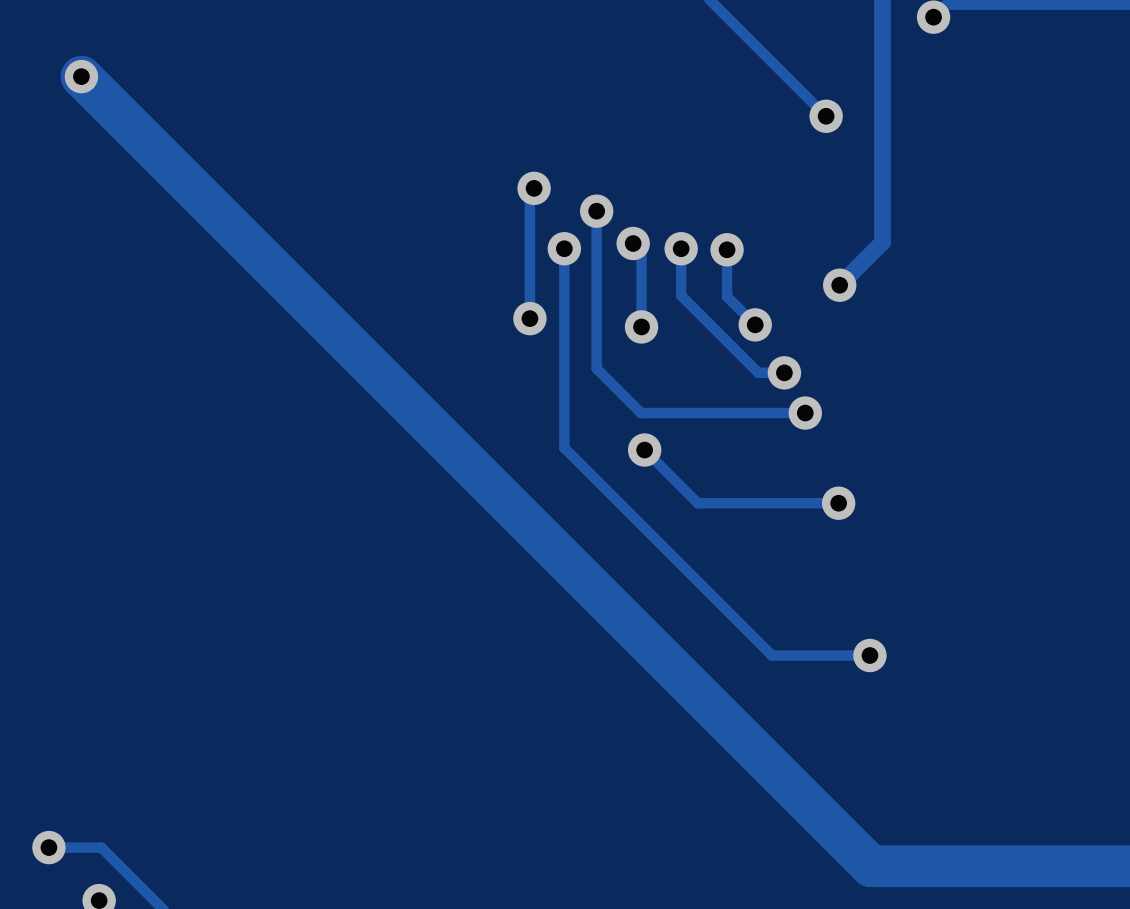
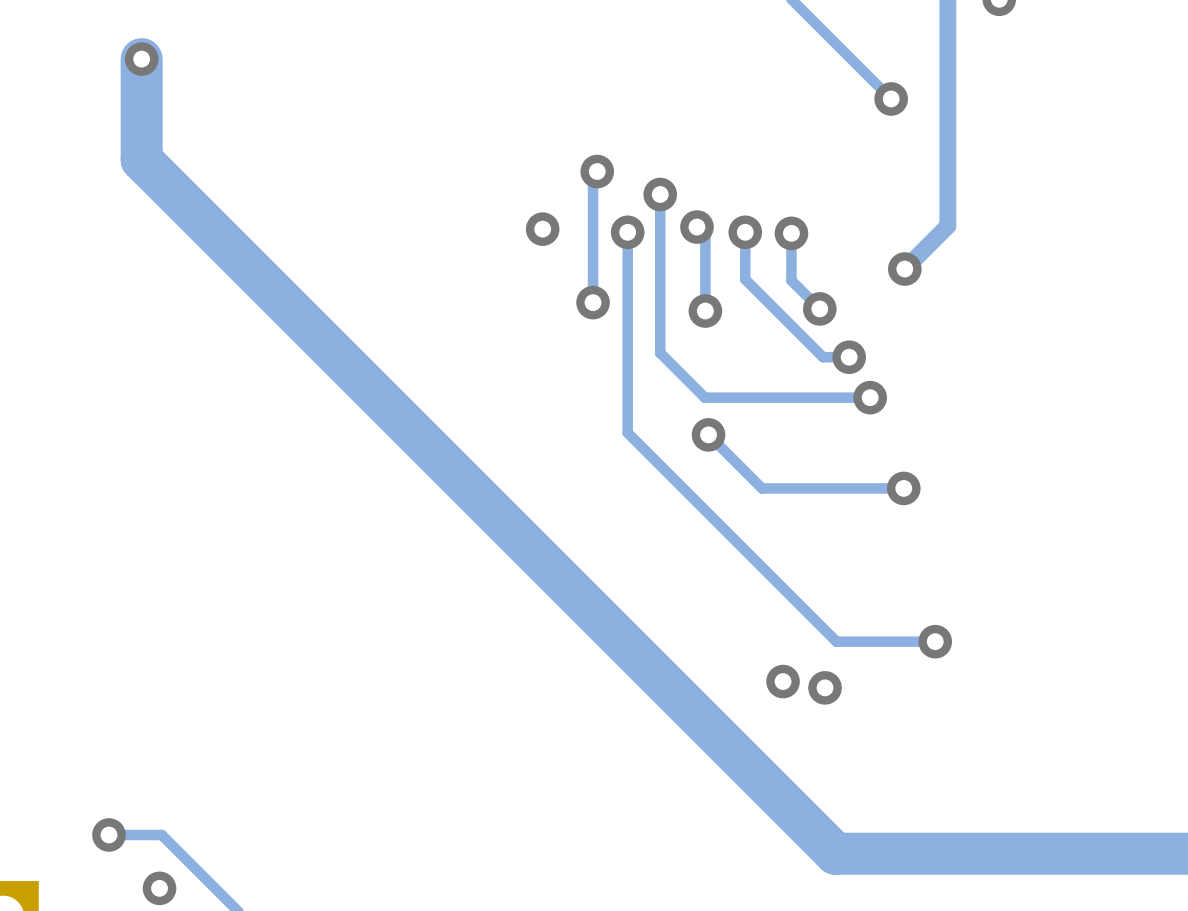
track: (81, 76) (870, 866) -> (141, 59) (141, 159) (835, 853) (936, 853)
via: none -> (542, 229)
via: none -> (783, 681)
via: none -> (825, 687)

